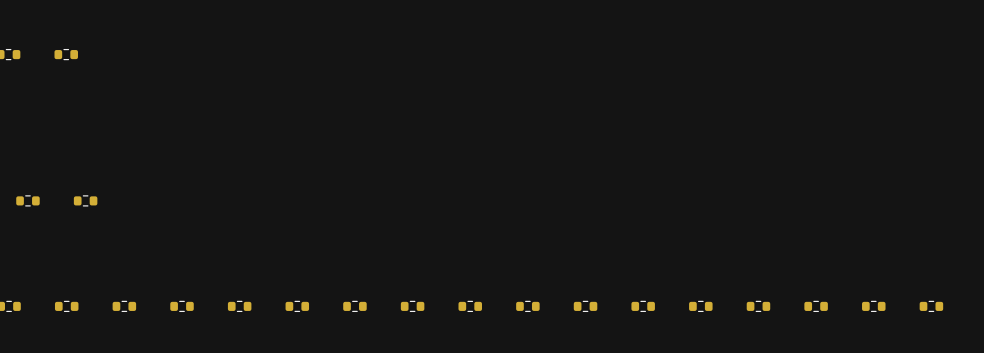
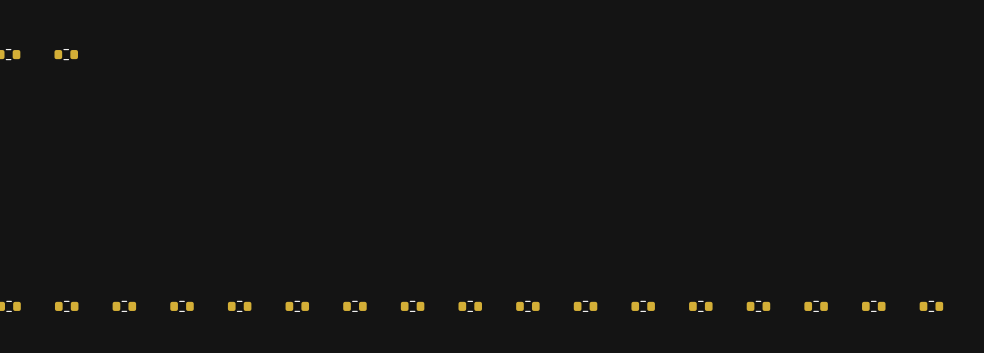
part: (27, 200) -> none
part: (85, 200) -> none

